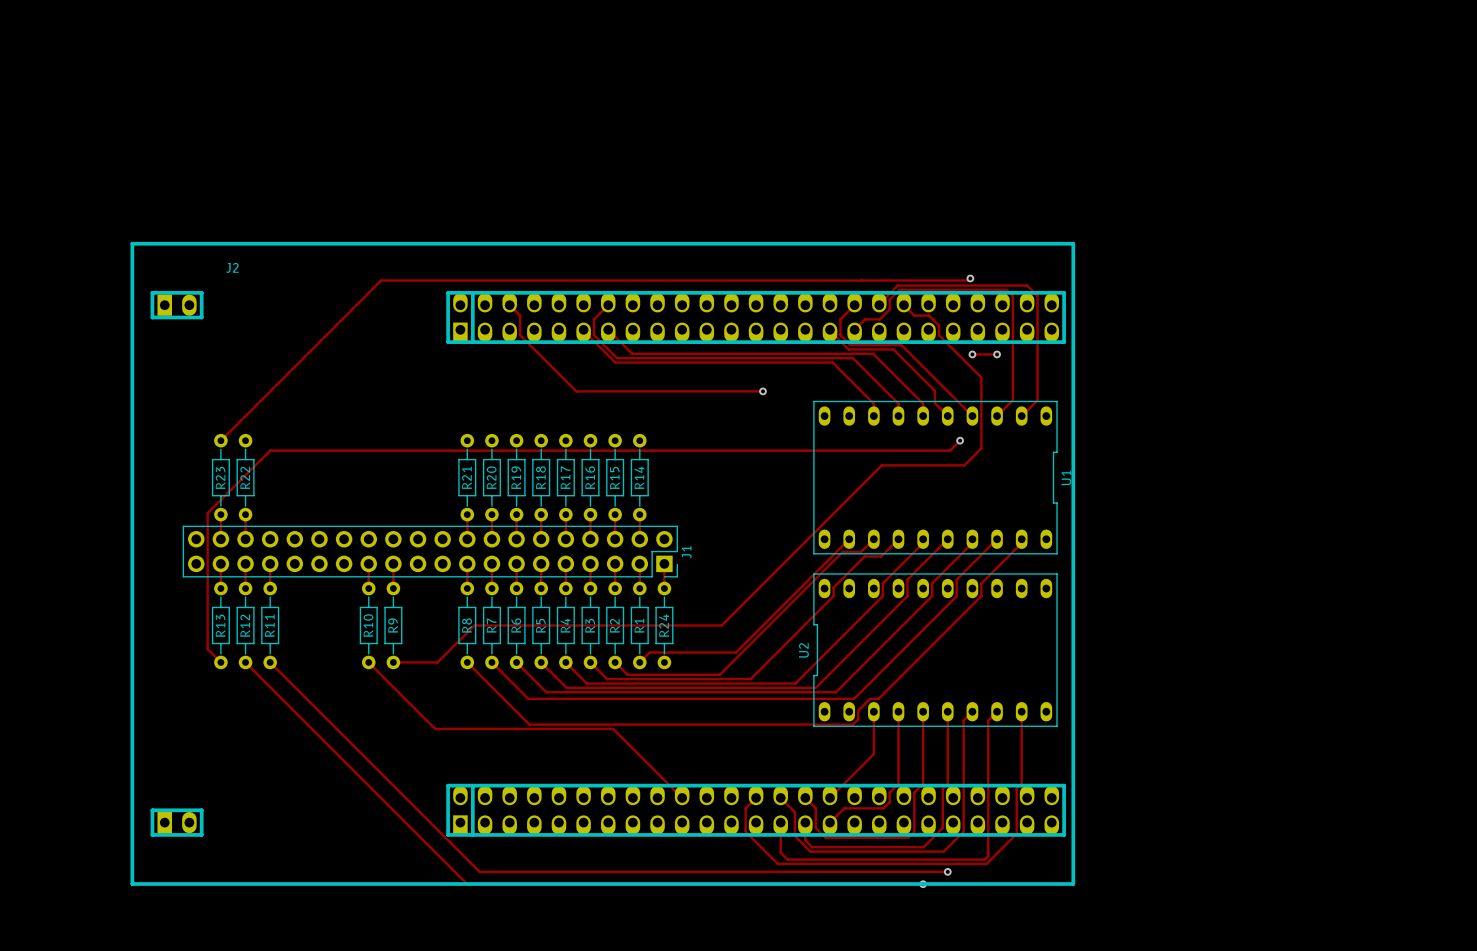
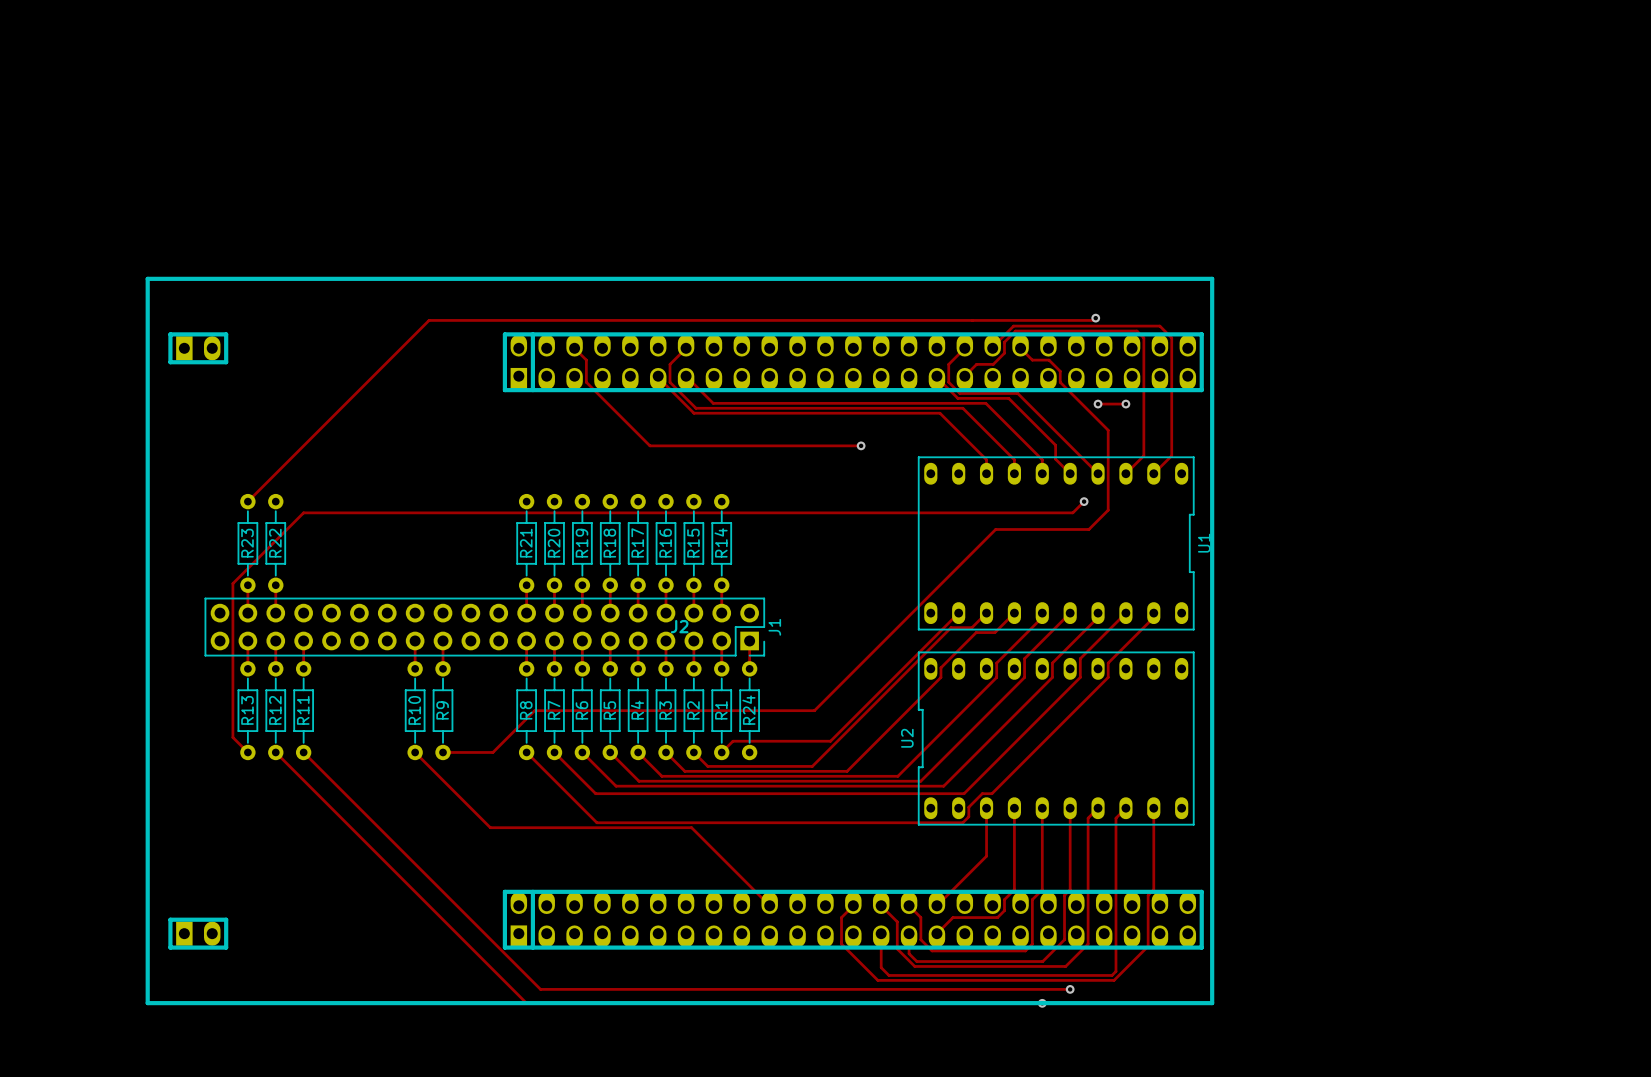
J2 name position: J2 (232, 267) -> J2 (679, 626)

